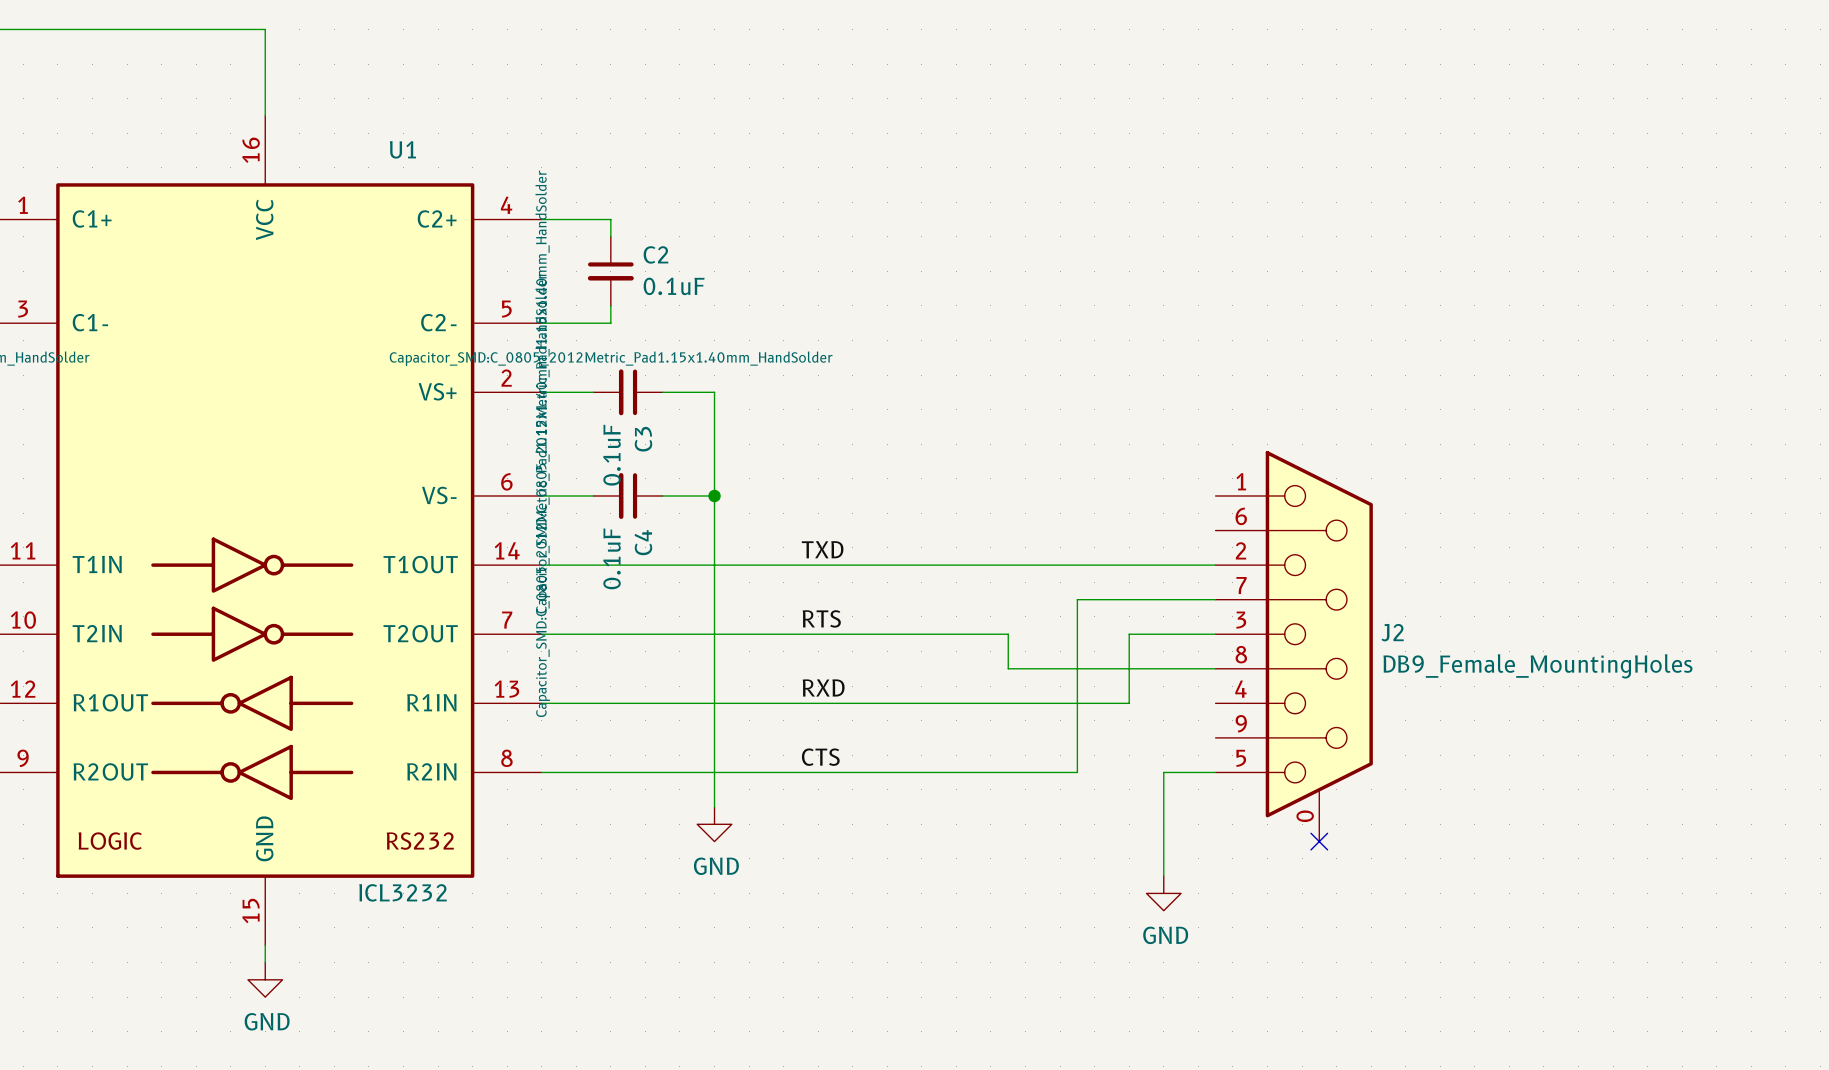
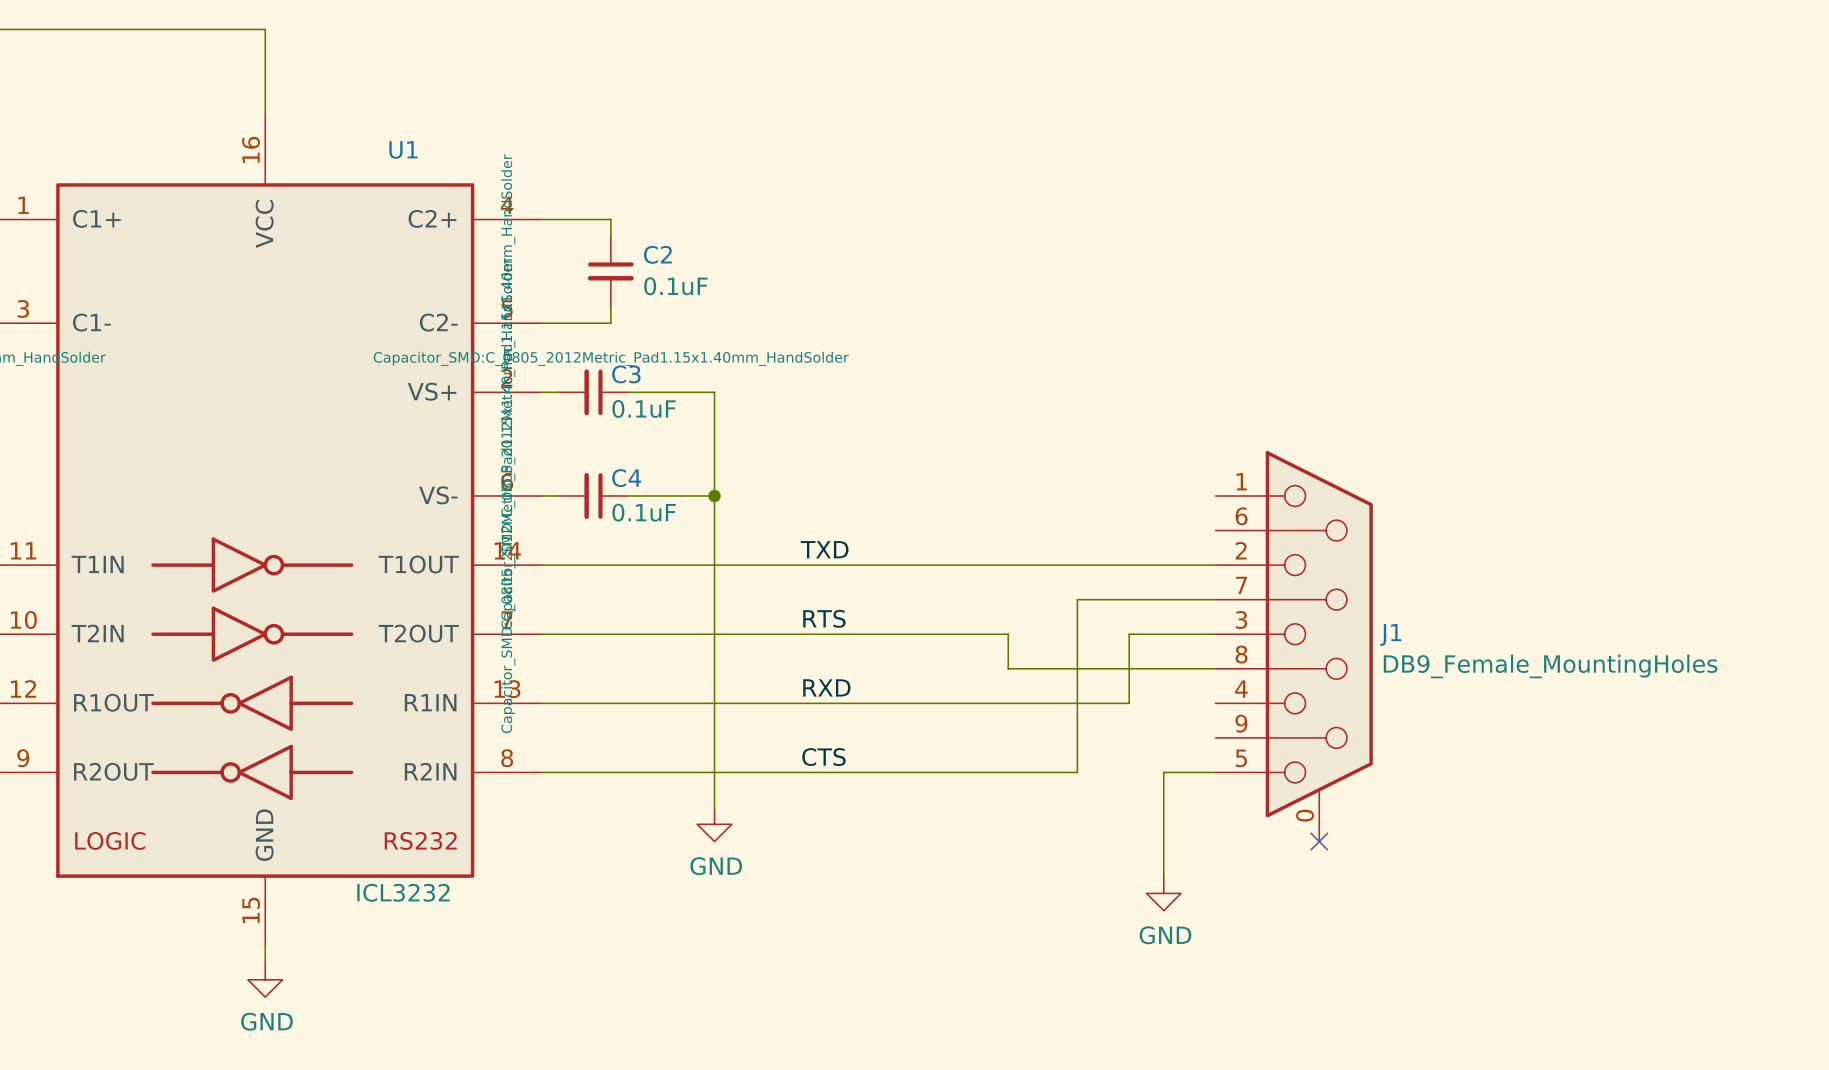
C3 position: (628, 392) -> (593, 392)
C3 name rotation: 0° (643, 439) -> 90° clockwise (626, 374)
C3 name position: C3 (643, 439) -> C3 (626, 374)
C3 value rotation: 0° (612, 455) -> 90° clockwise (644, 408)
C4 position: (628, 495) -> (593, 495)
C4 name rotation: 0° (643, 542) -> 90° clockwise (626, 478)
C4 name position: C4 (643, 542) -> C4 (626, 478)
C4 value rotation: 0° (612, 558) -> 90° clockwise (644, 512)
J2 name: J2 (1392, 632) -> J1 (1390, 634)

